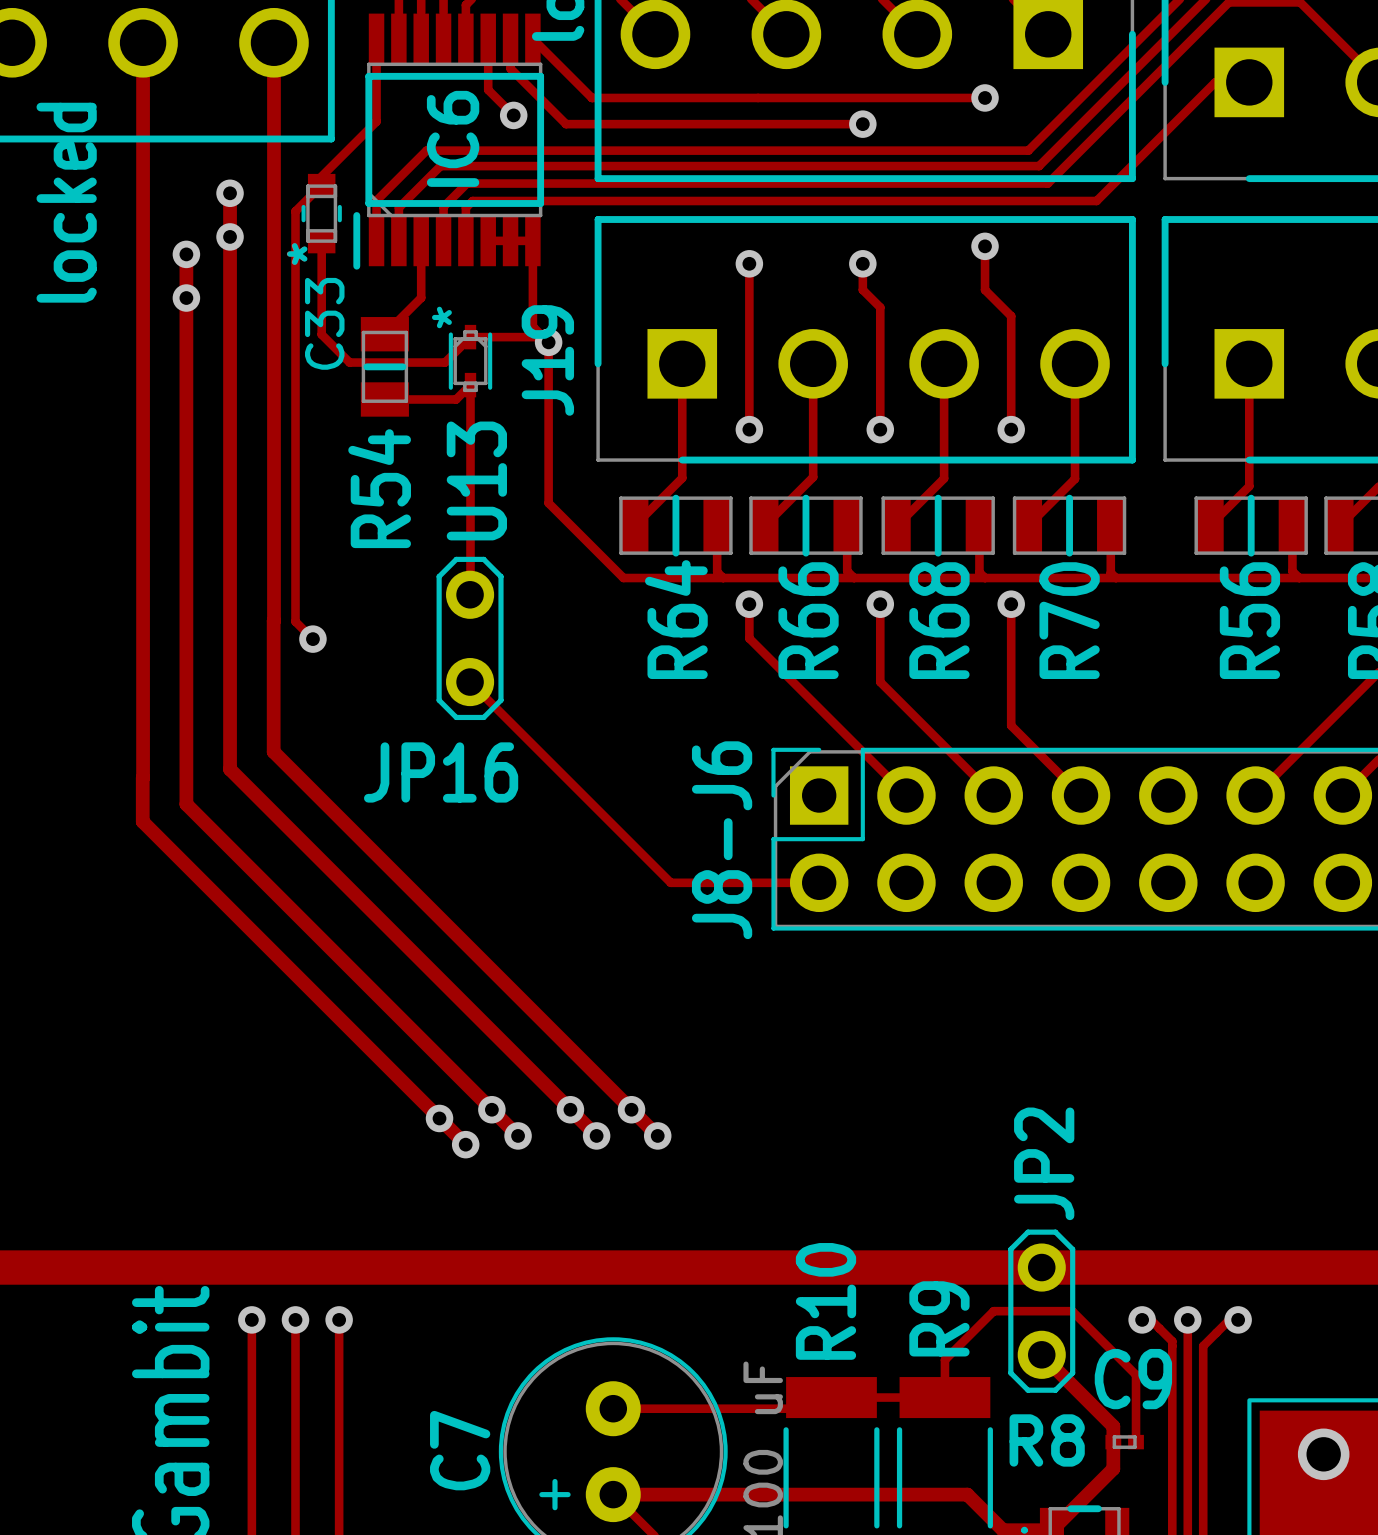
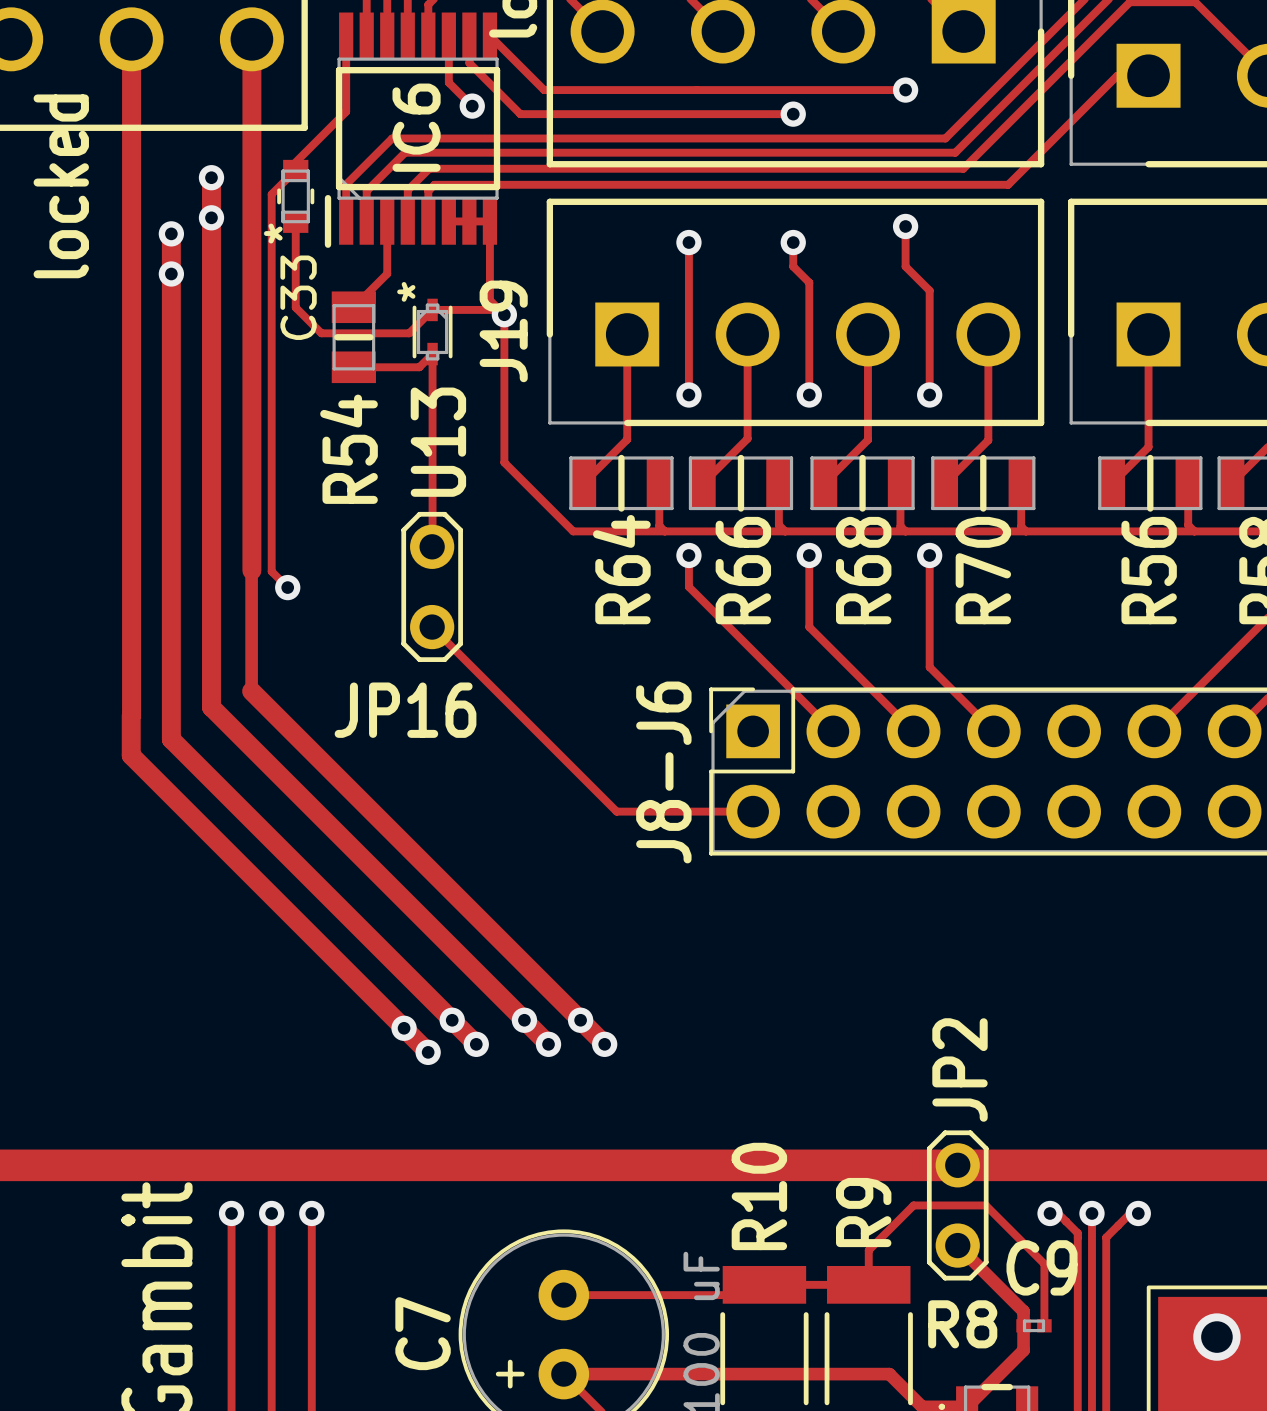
track width: thin (143, 42) (143, 777) -> thick (131, 39) (131, 715)
track width: thin (273, 42) (273, 620) -> thick (251, 39) (251, 570)
track width: thin (230, 193) (230, 769) (596, 1135) -> thick (211, 177) (211, 707) (548, 1044)
track width: thin (186, 254) (186, 804) (518, 1135) -> thick (171, 233) (171, 739) (476, 1044)
track width: thin (273, 751) (657, 1135) -> thick (251, 691) (604, 1044)
track width: thin (142, 778) (142, 821) (465, 1144) -> thick (131, 715) (131, 755) (428, 1052)

